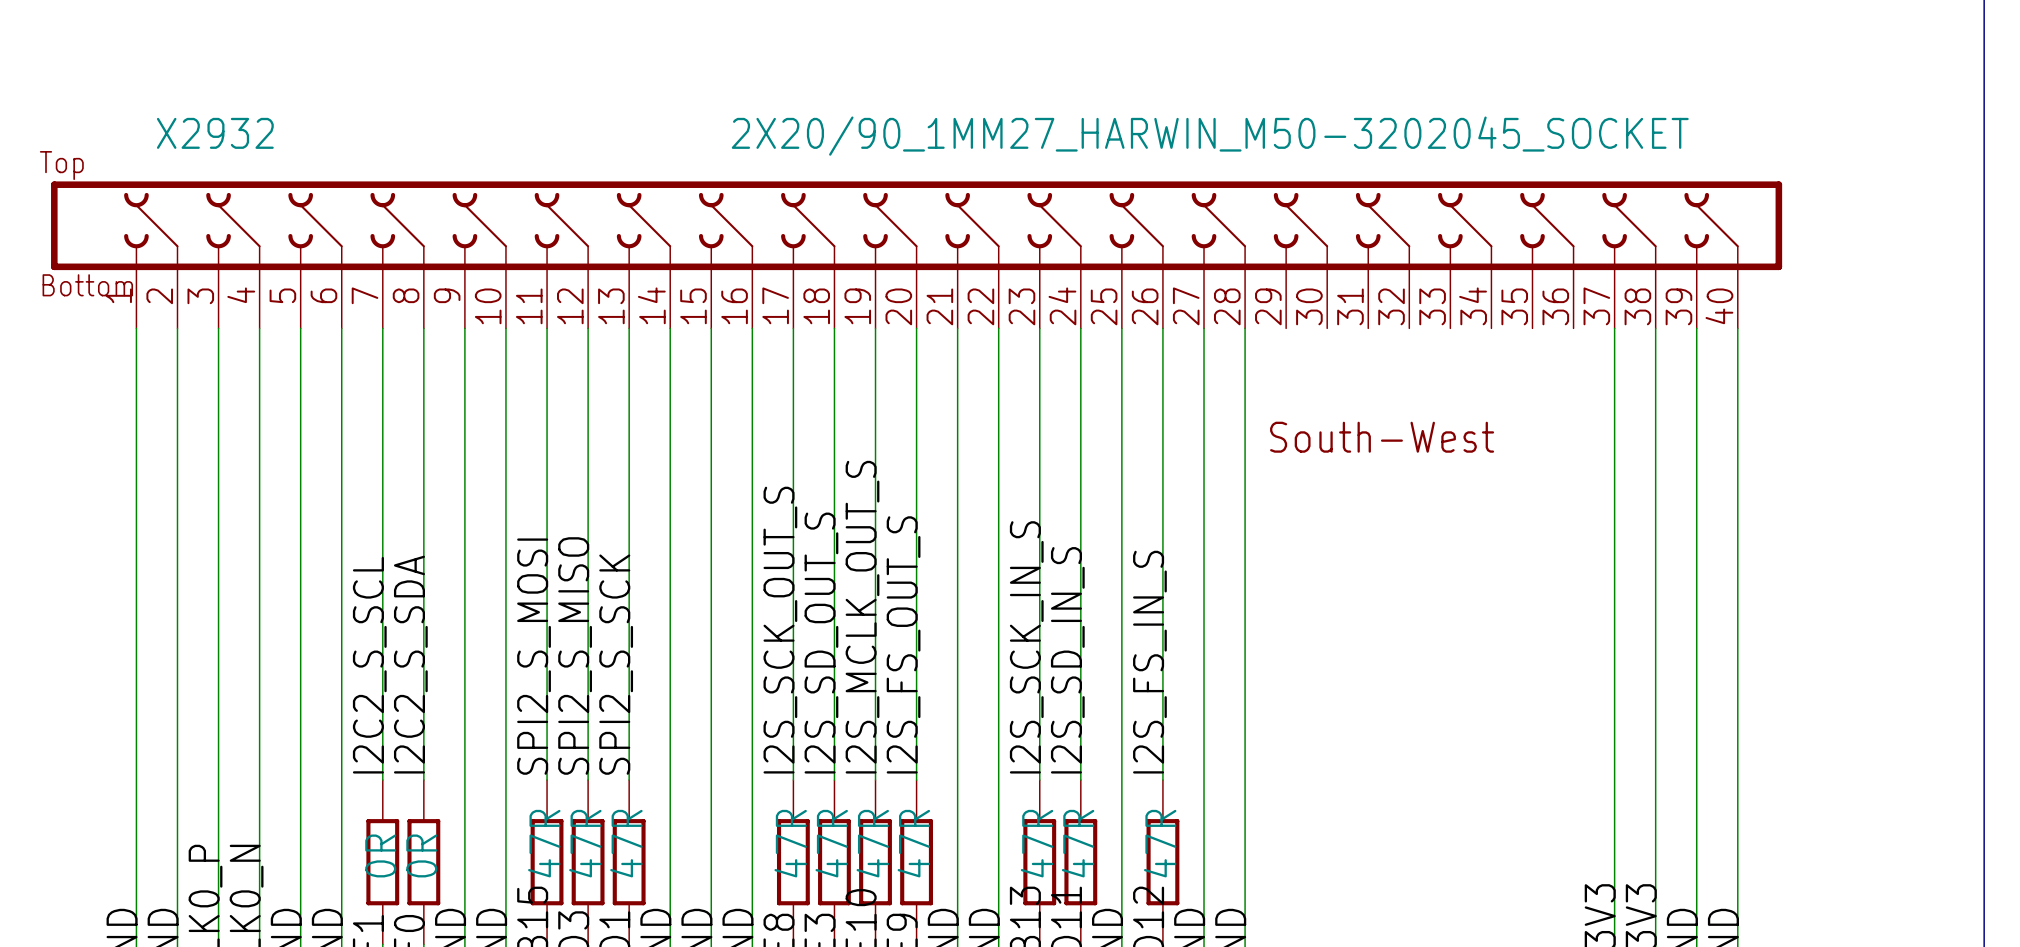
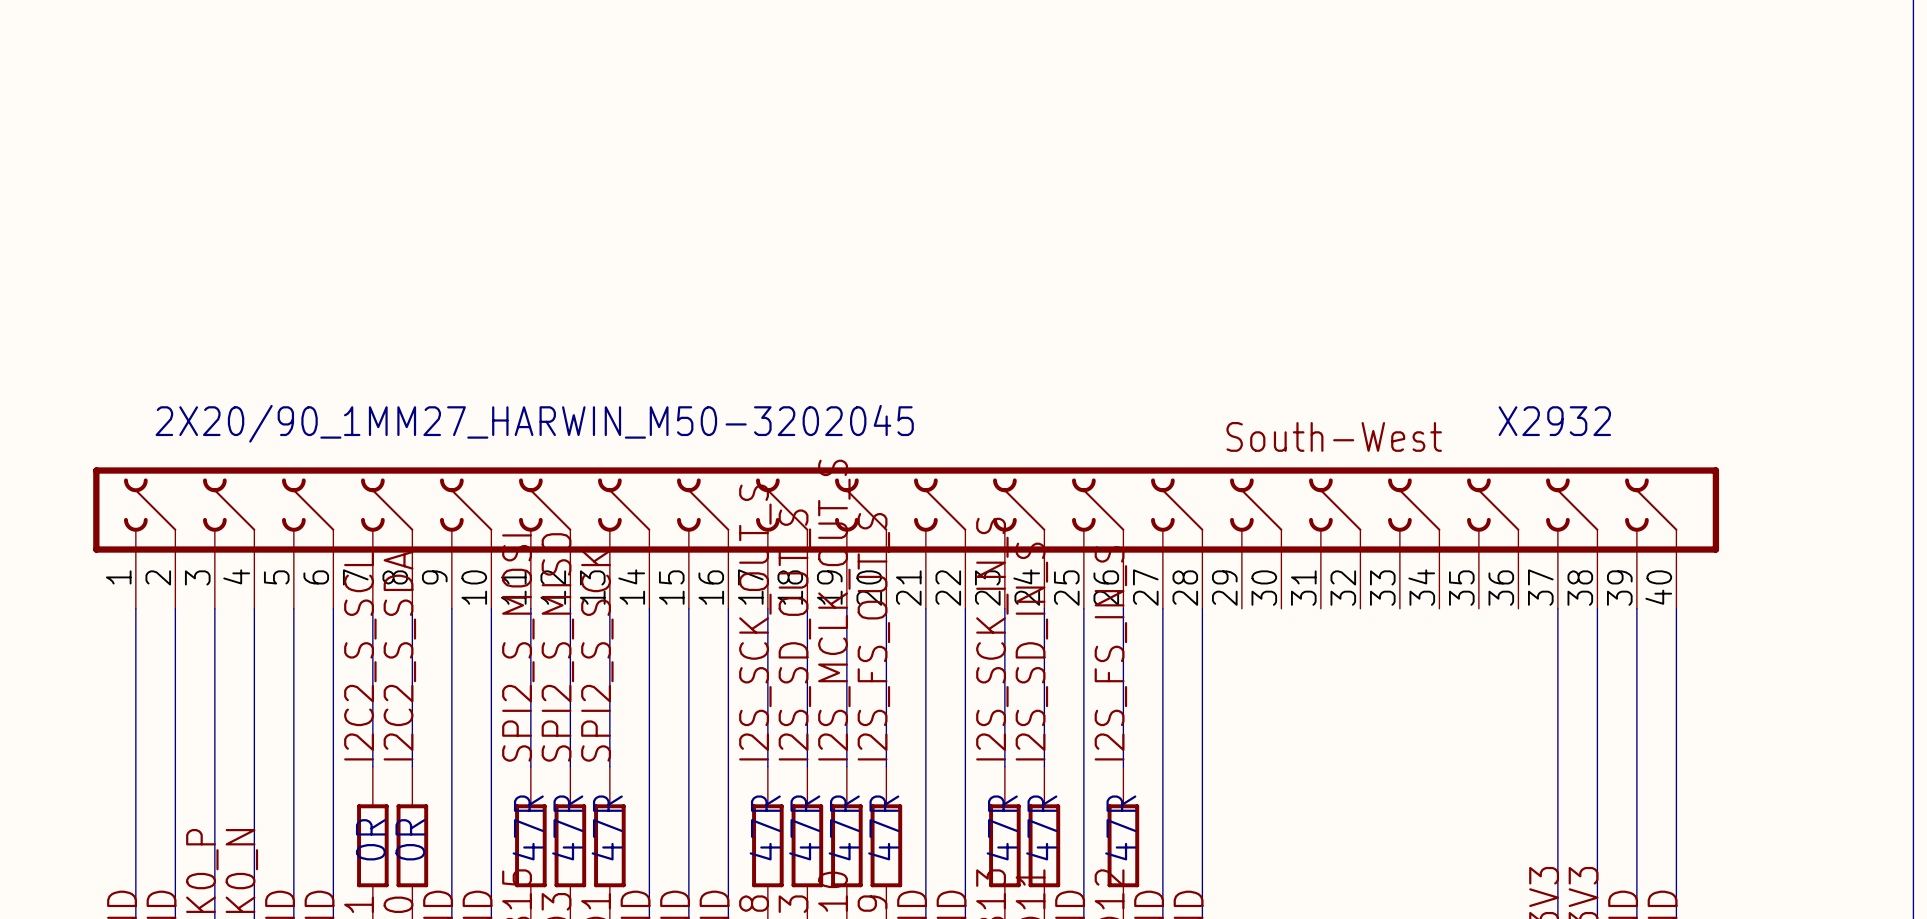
X2932 name position: X2932 (215, 133) -> X2932 (1554, 421)
X2932 value: 2X20/90_1MM27_HARWIN_M50-3202045_SOCKET (1210, 136) -> 2X20/90_1MM27_HARWIN_M50-3202045 (534, 423)
X2932 symbol: [51, 181, 1783, 329] -> [93, 467, 1720, 609]
wire: (136, 328) (136, 615) -> none
wire: (177, 328) (177, 615) -> none
wire: (218, 328) (218, 615) -> none
wire: (259, 328) (259, 615) -> none
wire: (300, 328) (300, 615) -> none
wire: (341, 328) (341, 615) -> none
wire: (382, 328) (382, 615) -> none
wire: (423, 328) (423, 615) -> none
wire: (464, 328) (464, 615) -> none
wire: (505, 328) (505, 615) -> none
wire: (547, 328) (547, 615) -> none
wire: (588, 328) (588, 615) -> none
wire: (629, 328) (629, 615) -> none
wire: (670, 328) (670, 615) -> none
wire: (711, 328) (711, 615) -> none
wire: (752, 328) (752, 615) -> none
wire: (793, 328) (793, 615) -> none
wire: (834, 328) (834, 615) -> none
wire: (875, 328) (875, 615) -> none
wire: (916, 328) (916, 615) -> none
wire: (957, 328) (957, 615) -> none
wire: (998, 328) (998, 615) -> none
wire: (1039, 328) (1039, 615) -> none
wire: (1080, 328) (1080, 615) -> none
wire: (1121, 328) (1121, 615) -> none
wire: (1162, 328) (1162, 615) -> none
wire: (1204, 328) (1204, 615) -> none
wire: (1245, 328) (1245, 615) -> none
wire: (1614, 328) (1614, 615) -> none
wire: (1655, 328) (1655, 615) -> none
wire: (1696, 328) (1696, 615) -> none
wire: (1737, 328) (1737, 615) -> none

